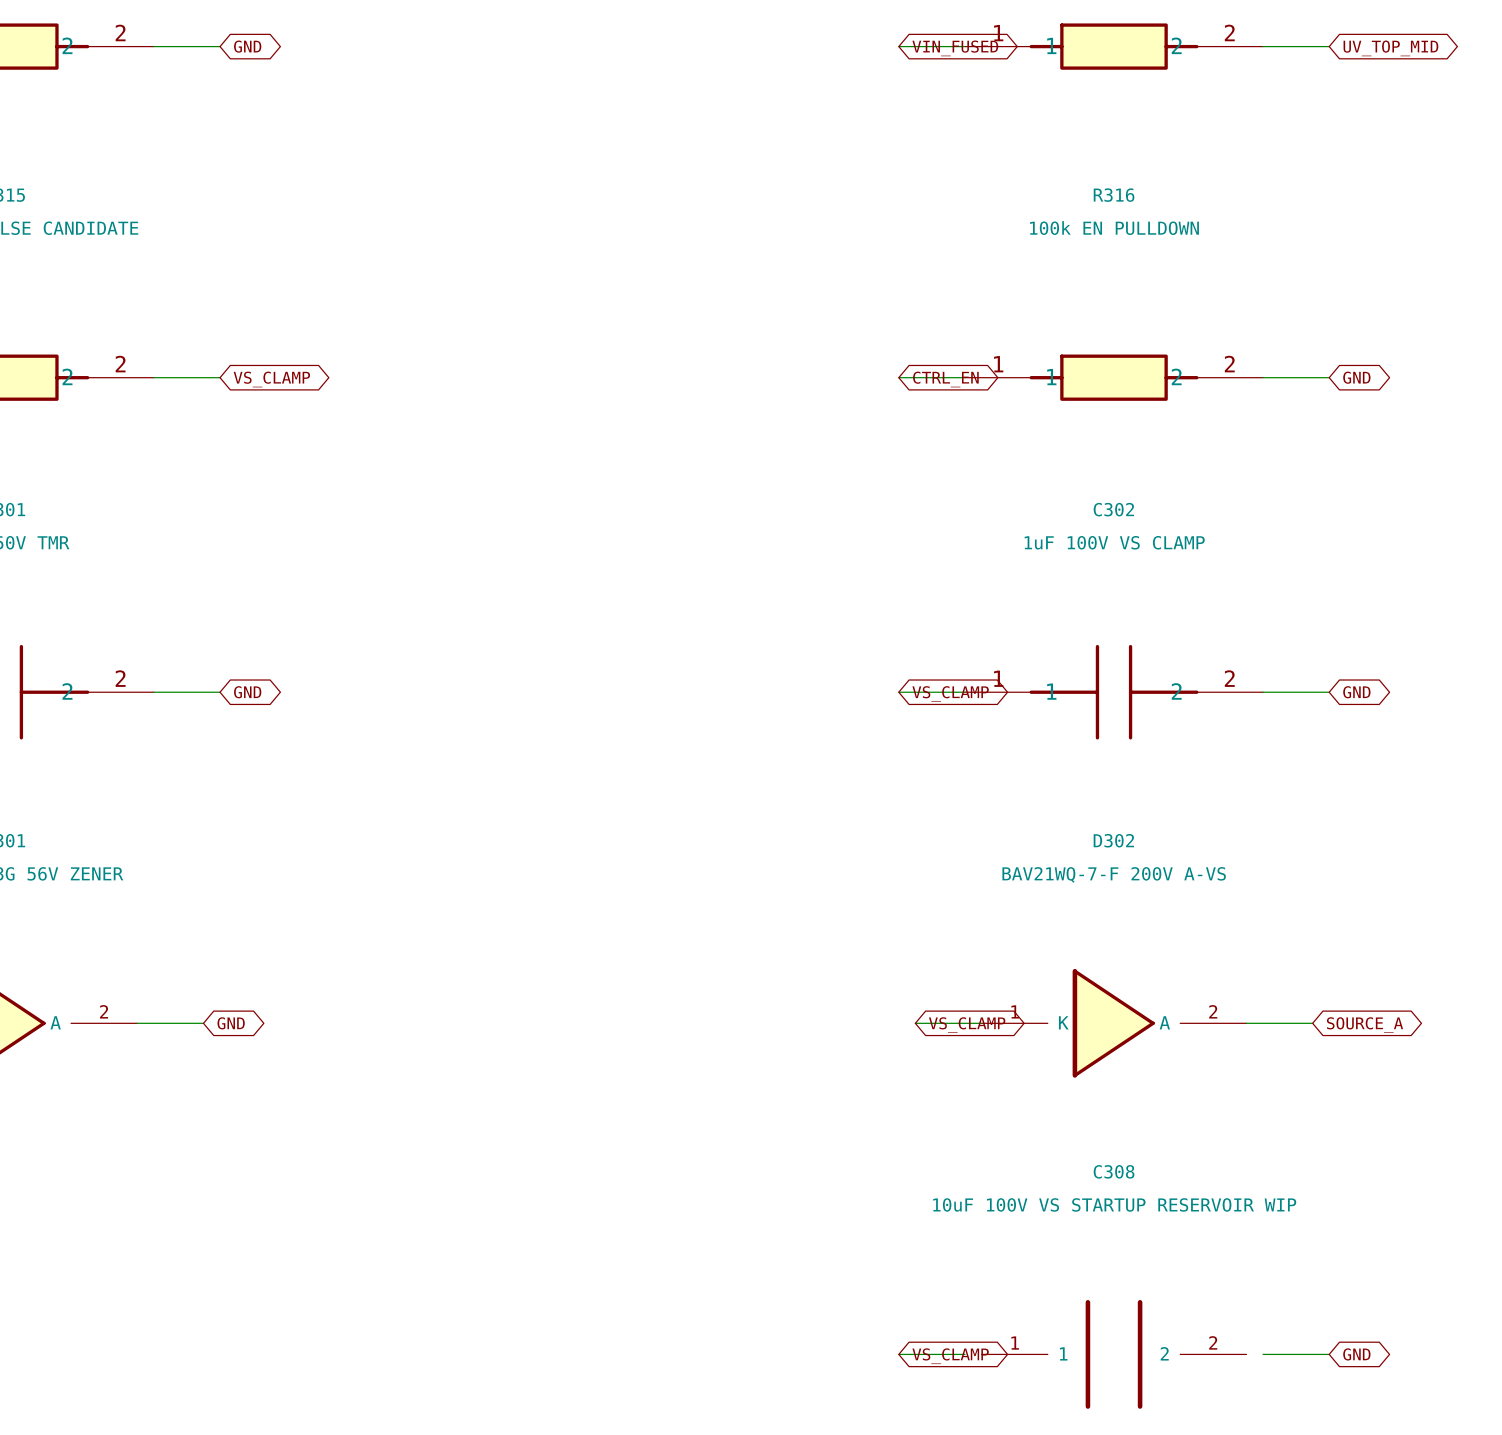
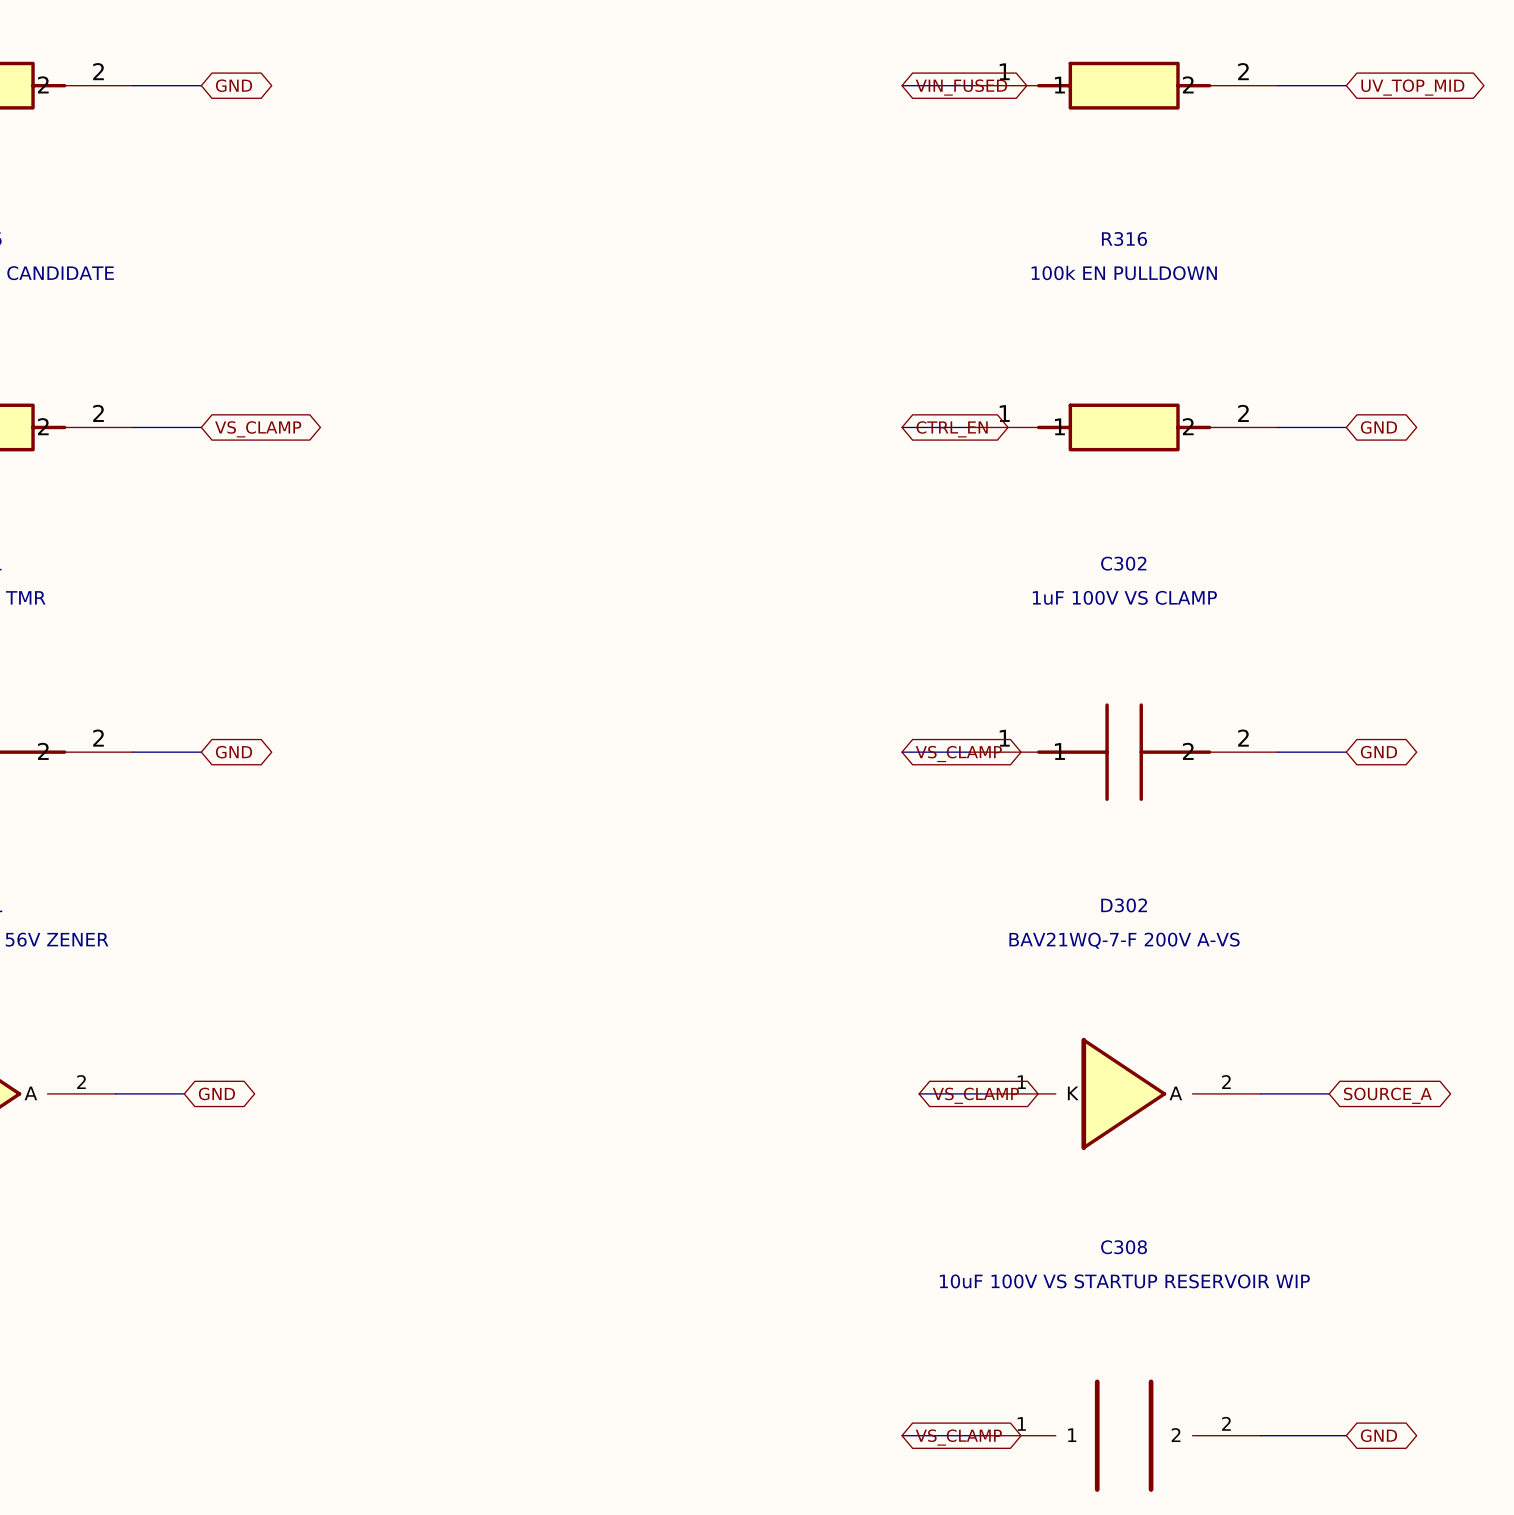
wire: none -> (970, 1435) (987, 1435)
wire: none -> (1260, 1435) (1277, 1435)

